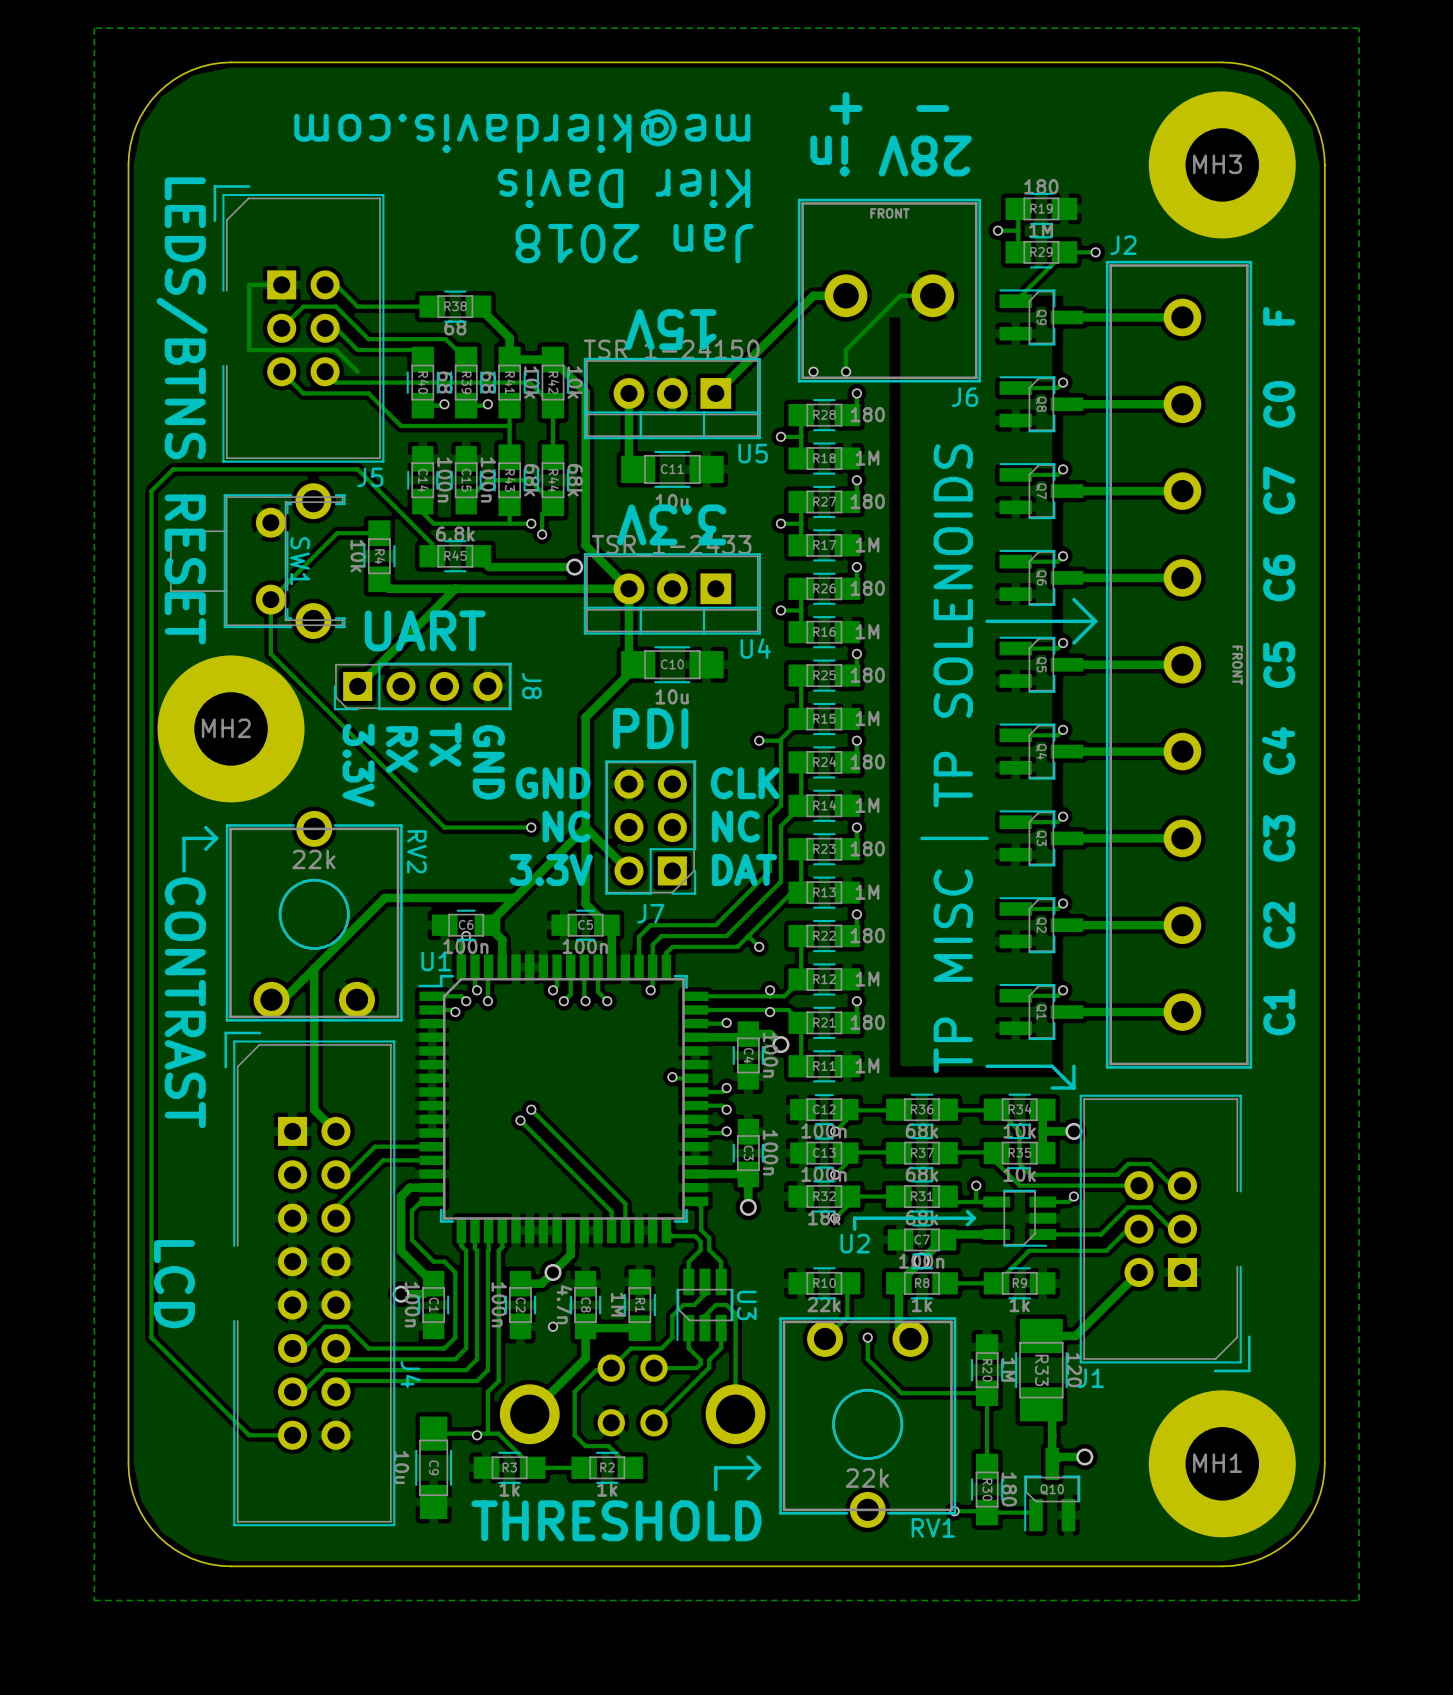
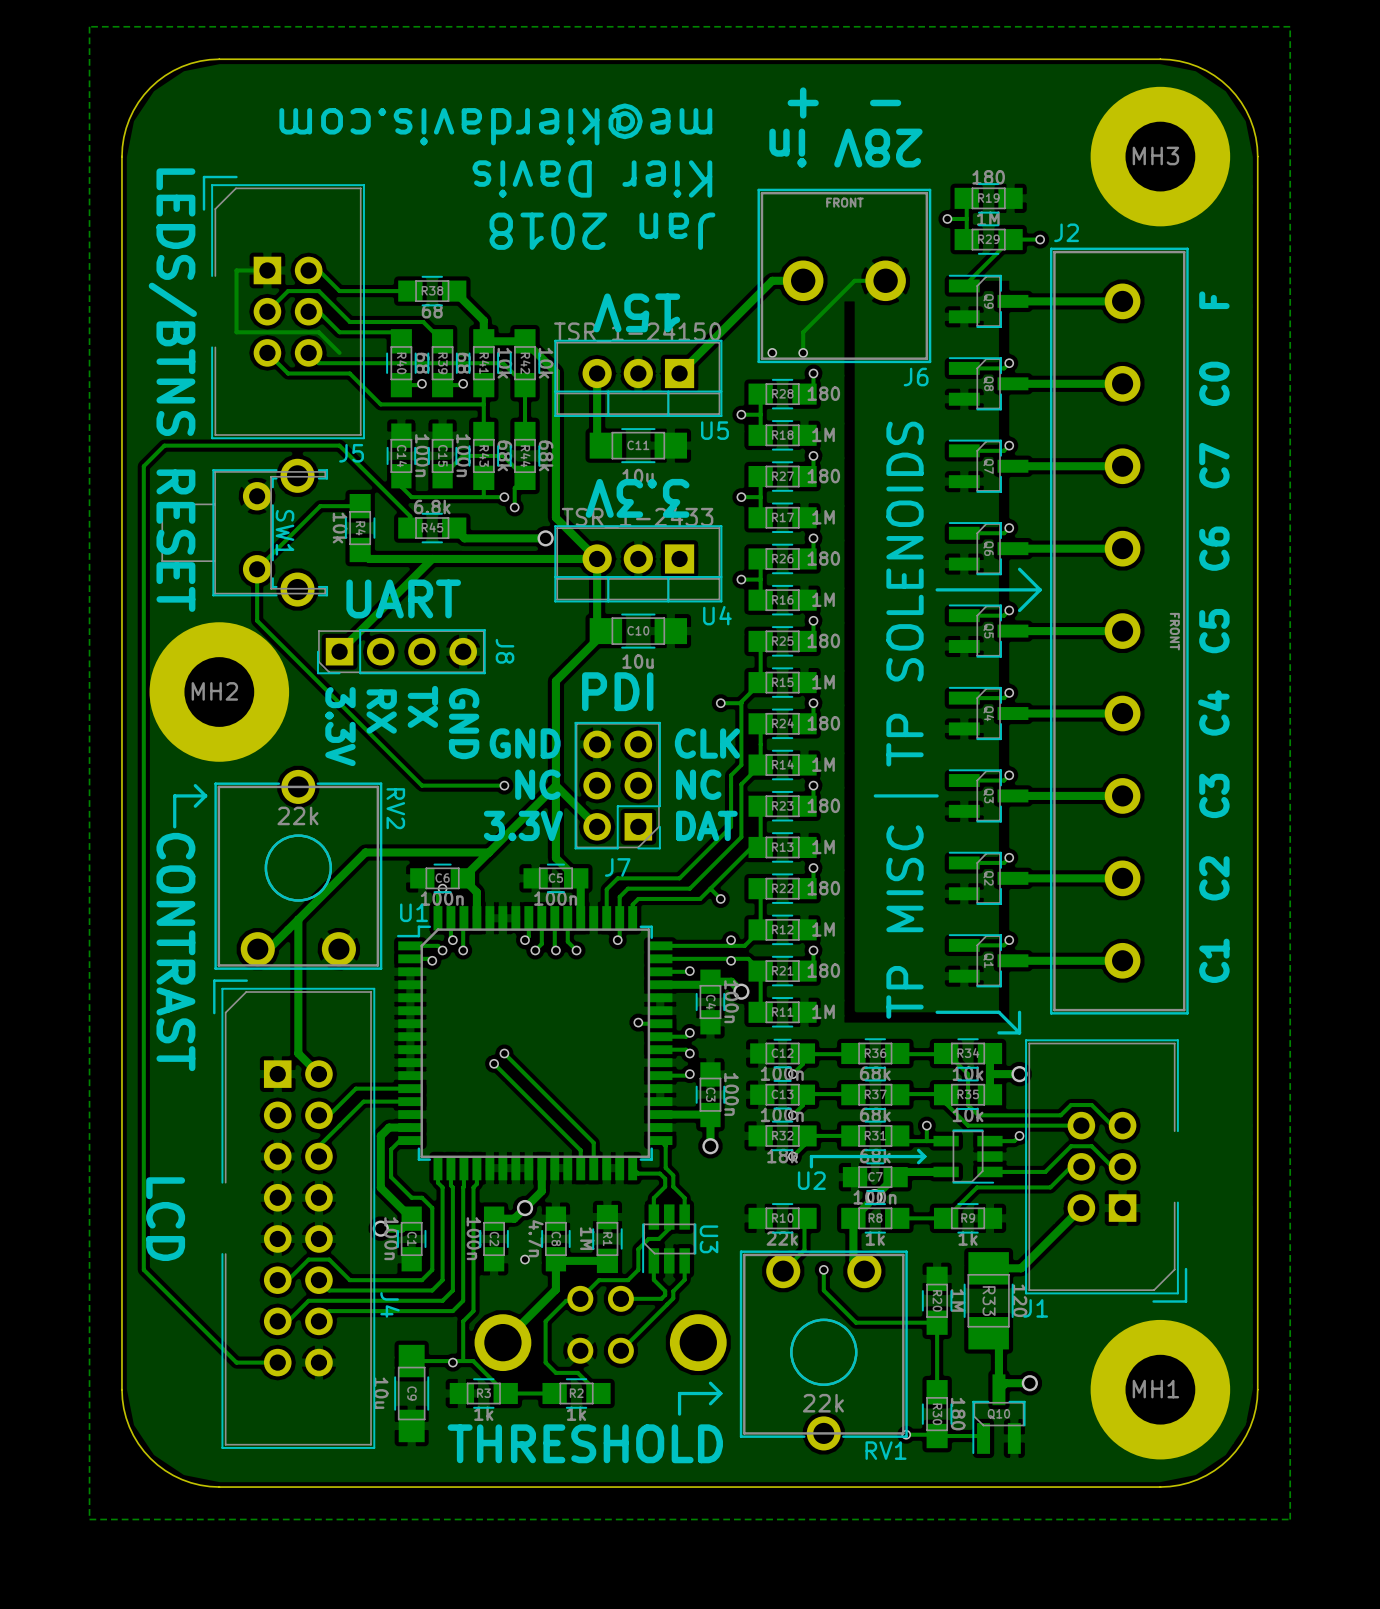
track: (704, 1328) (704, 1315) (715, 1305) (726, 1305) (735, 1313) (735, 1414) -> none

